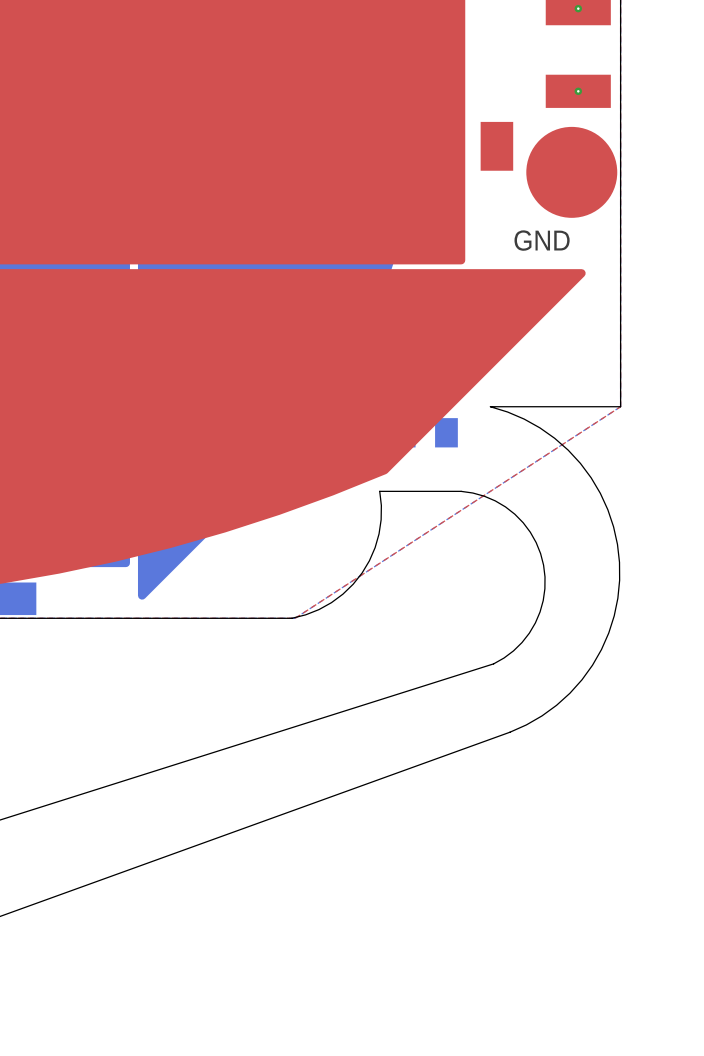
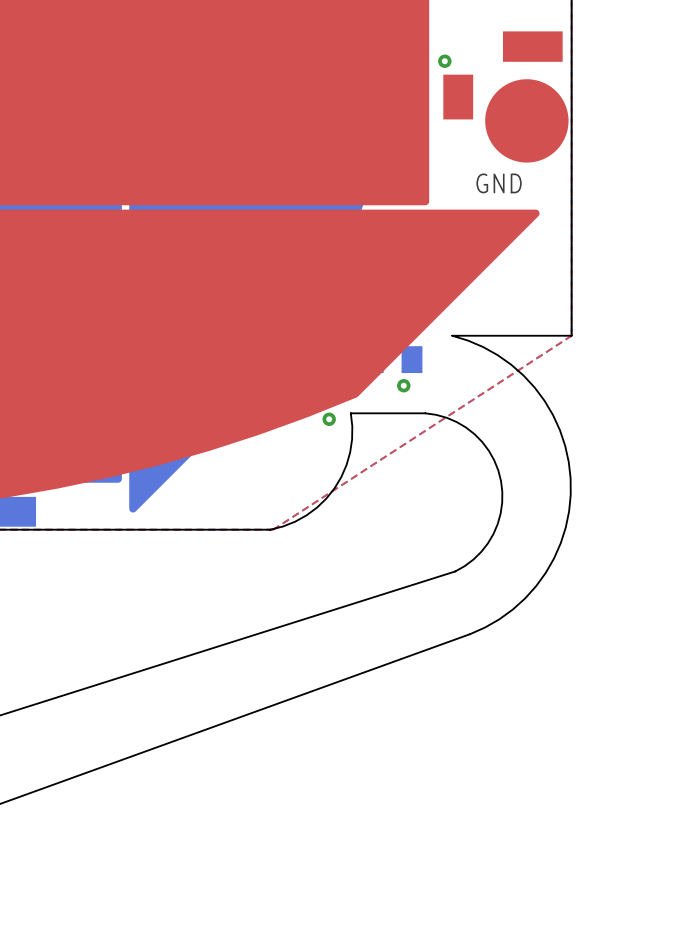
via: (578, 91) -> none
via: none -> (444, 61)
via: none -> (403, 385)
via: none -> (329, 419)

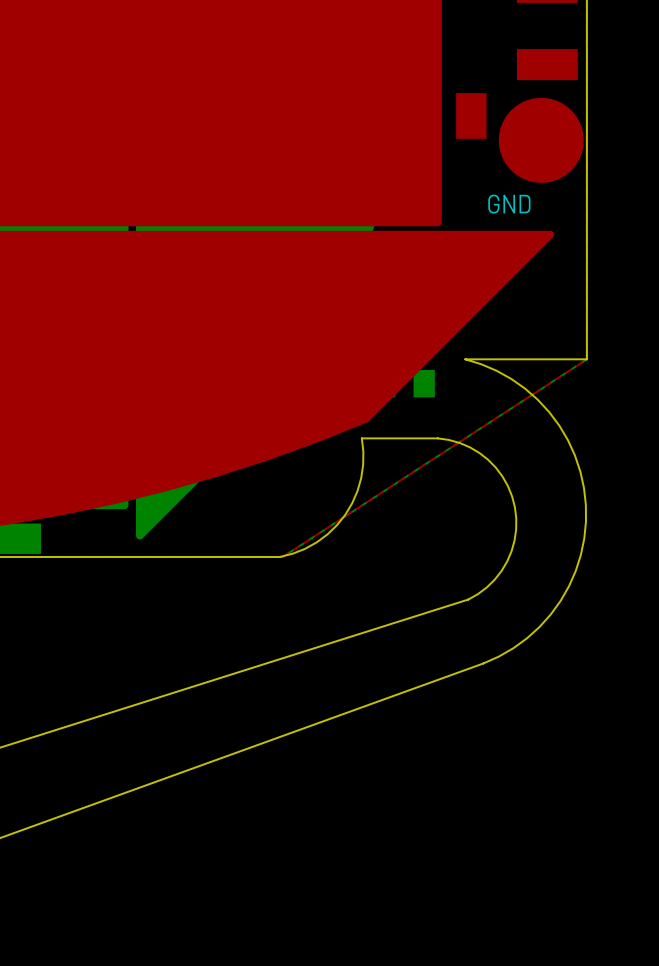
via: (444, 61) -> none
via: (403, 385) -> none
via: (329, 419) -> none

